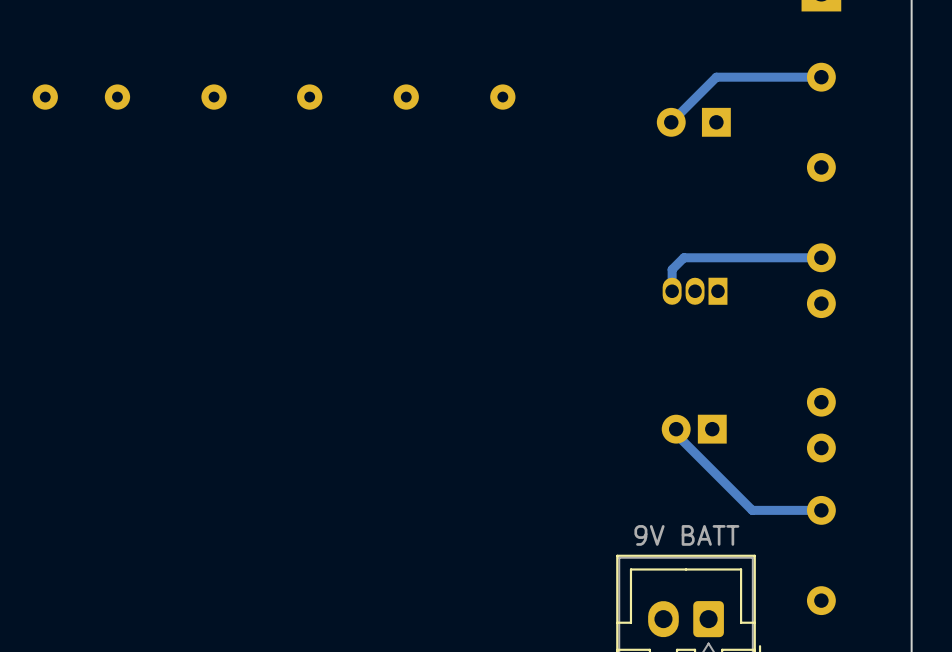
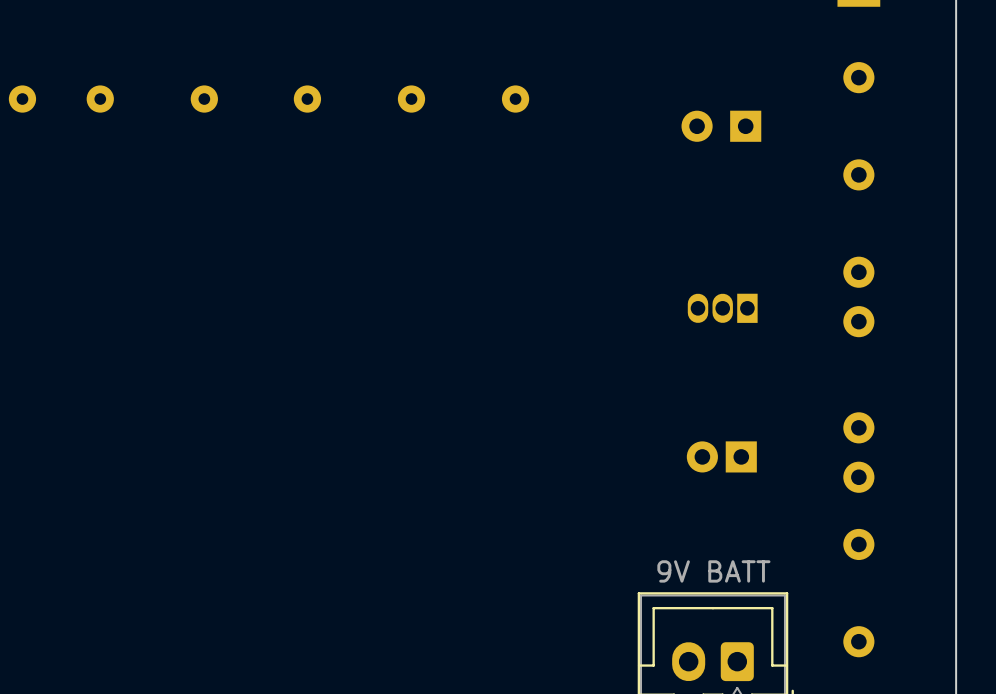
track: (821, 77) (716, 77) (671, 122) -> none
track: (821, 257) (683, 257) (672, 269) (672, 291) -> none
track: (676, 429) (676, 434) (752, 510) (821, 510) -> none

